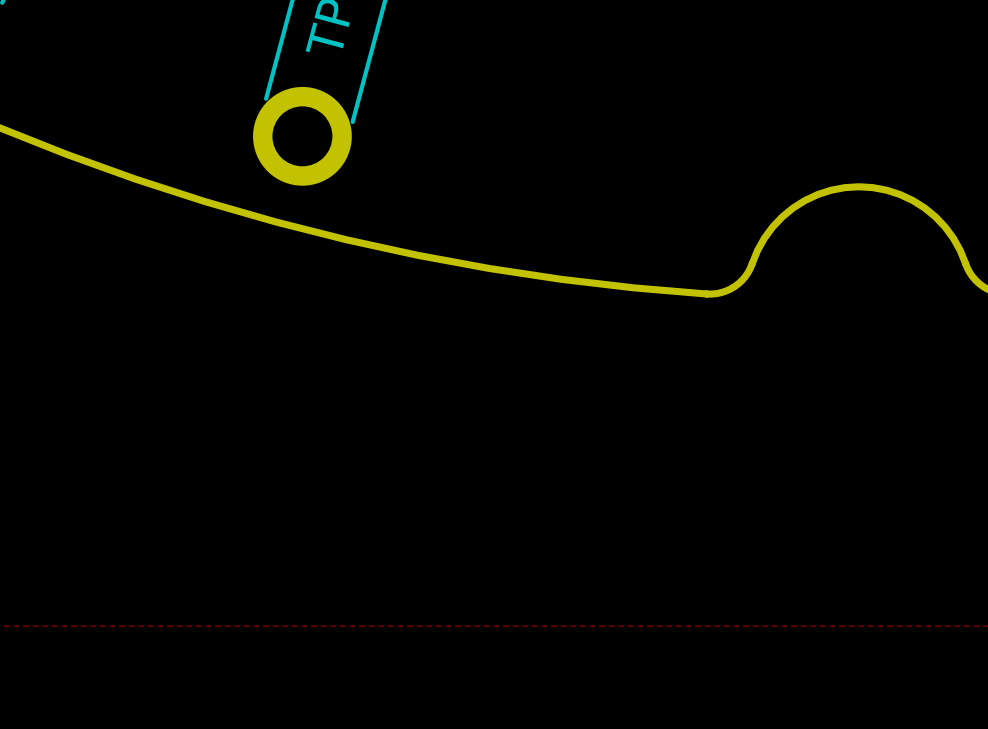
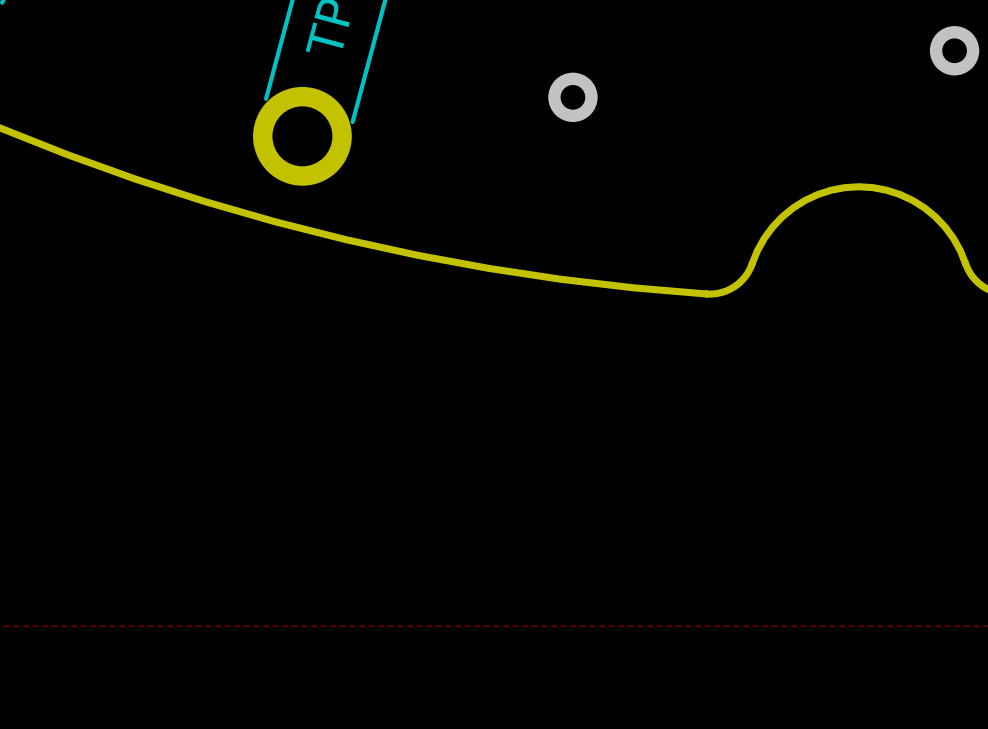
via: none -> (954, 50)
via: none -> (572, 97)

